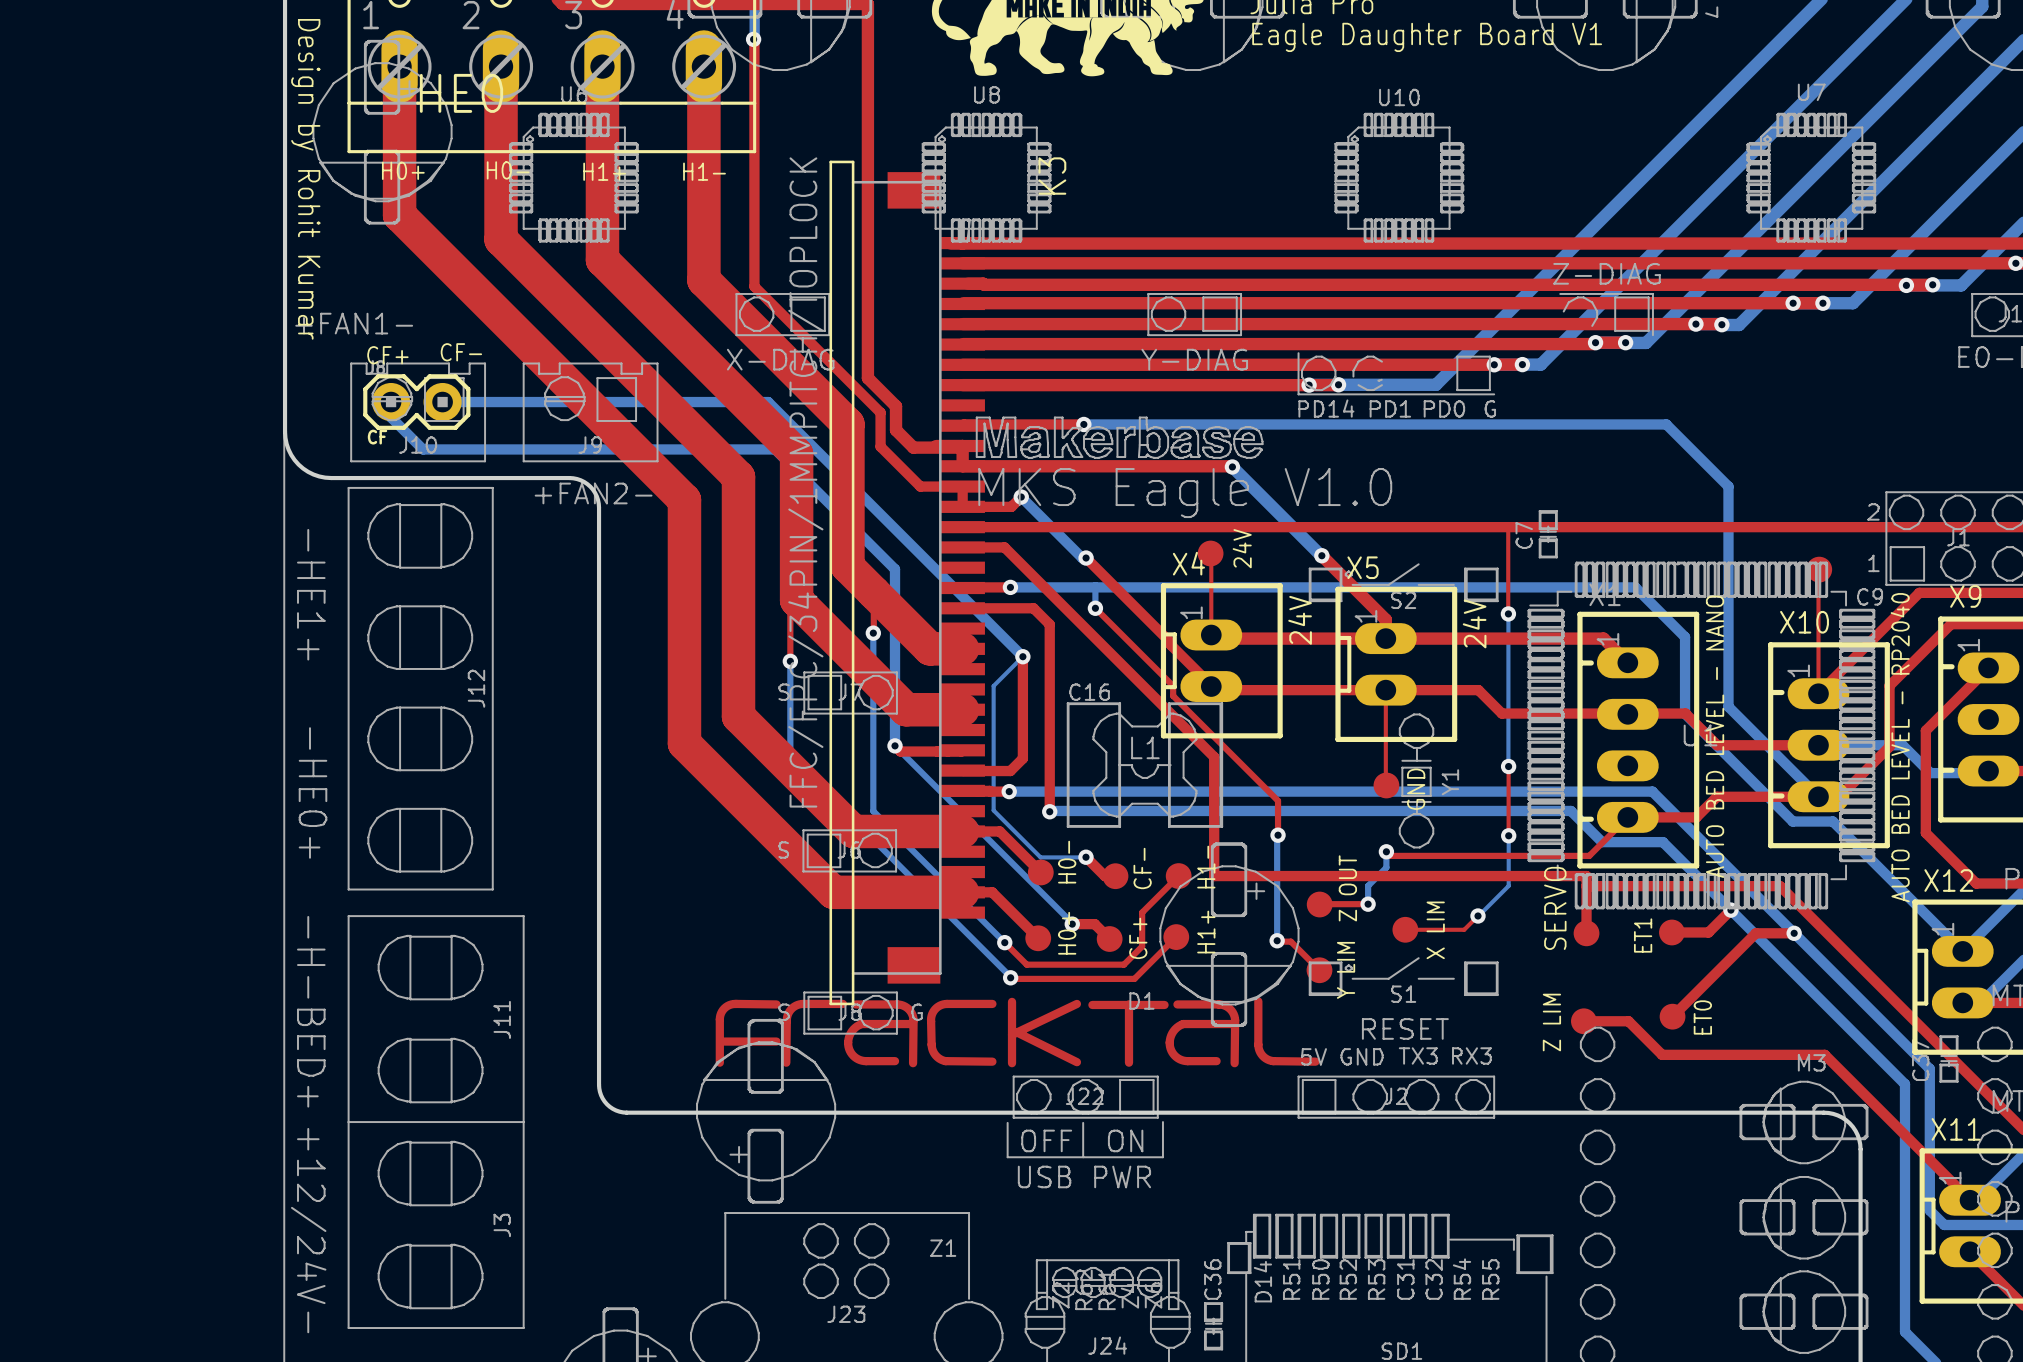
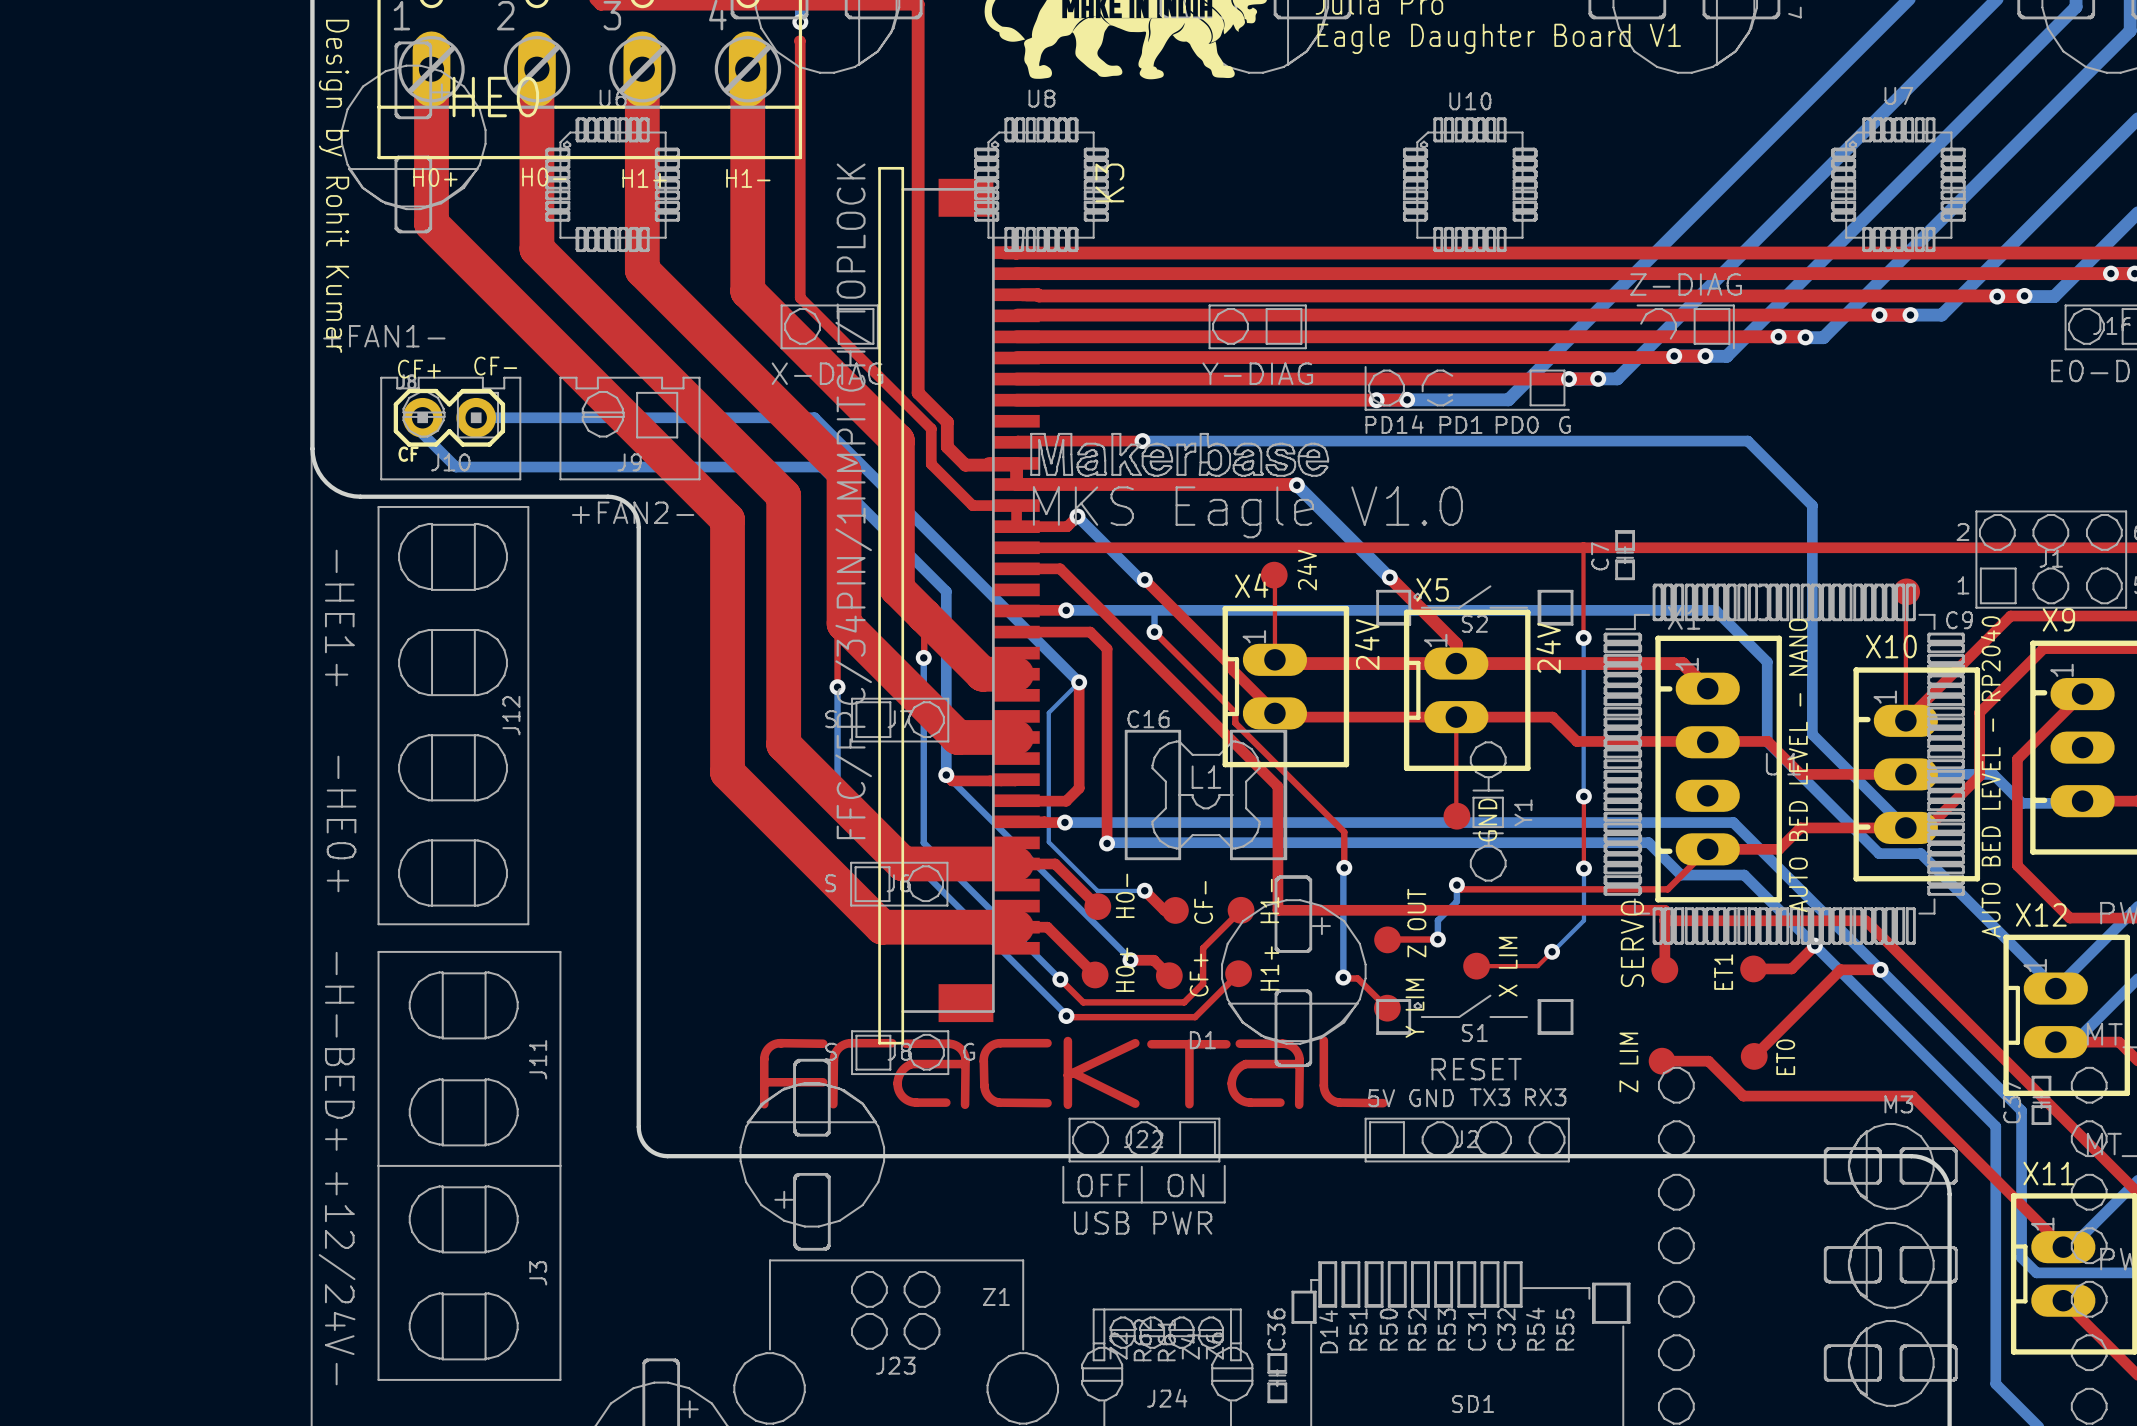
via position: (753, 39) -> (800, 22)

